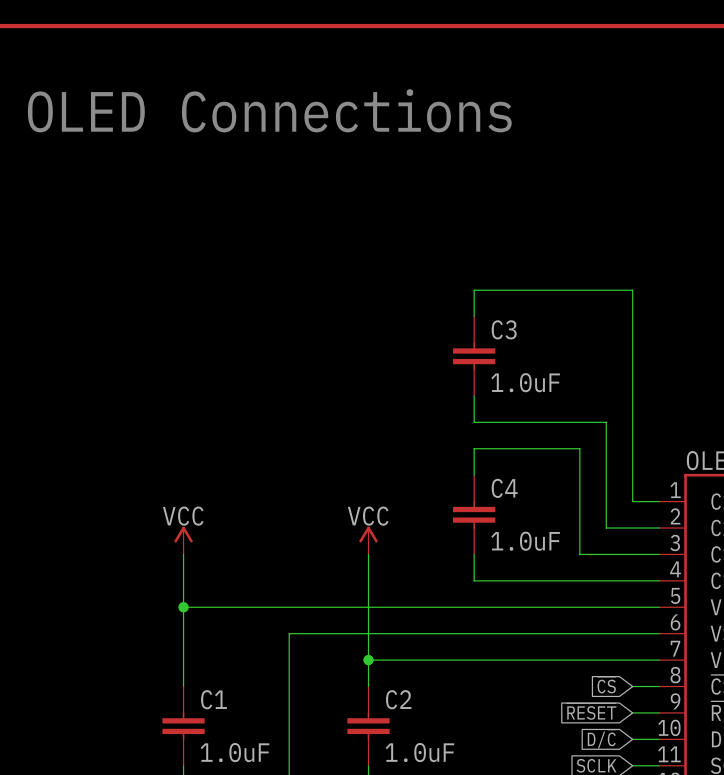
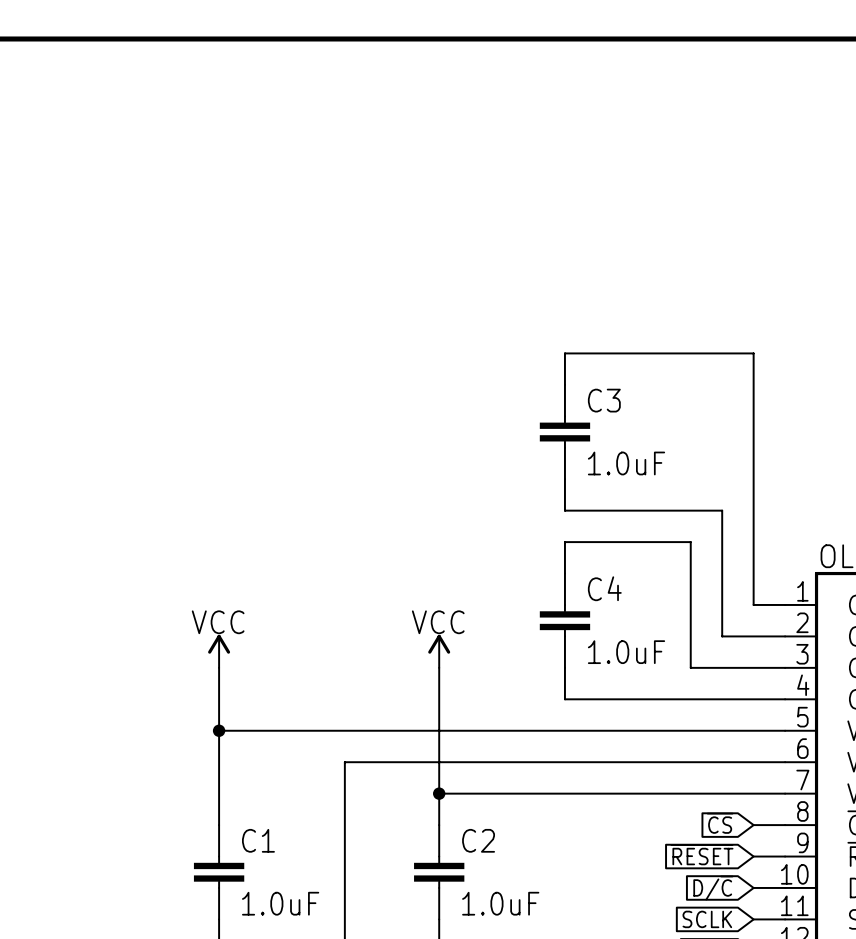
text: OLED Connections (269, 110) -> none

